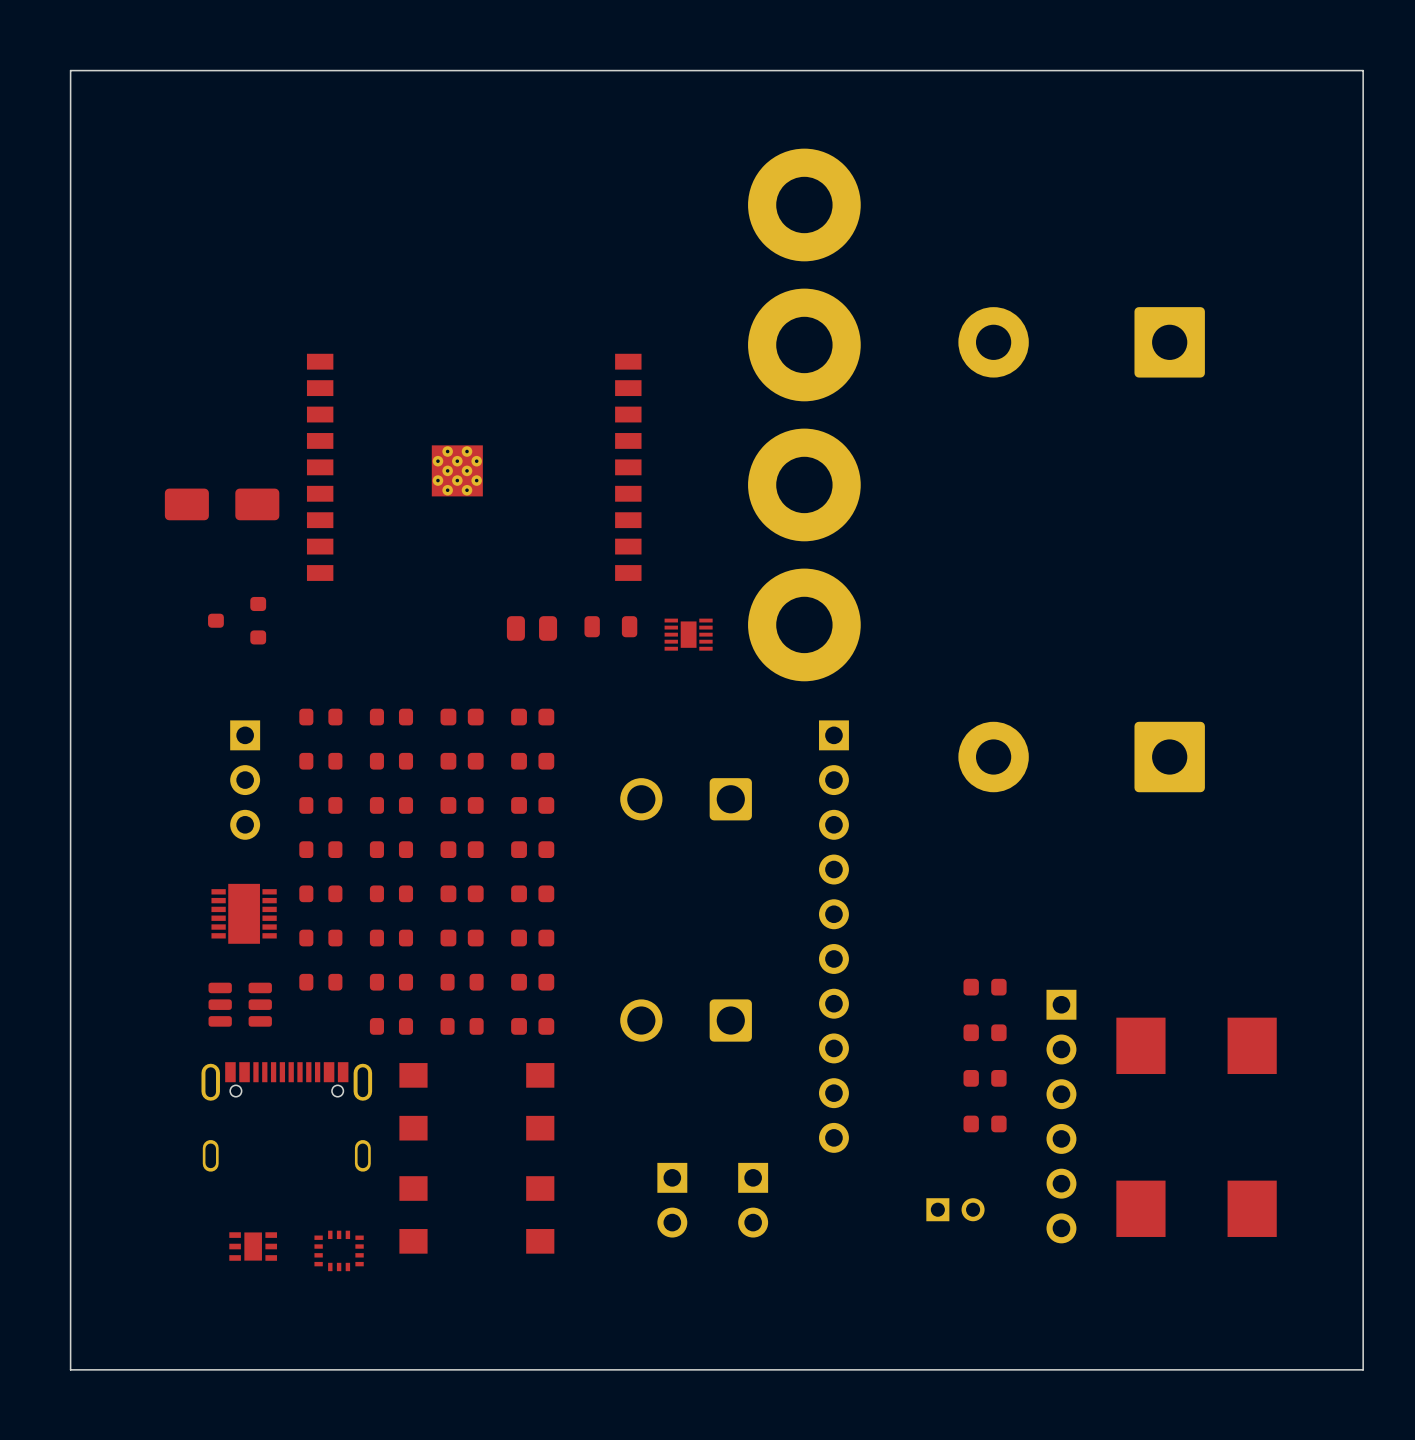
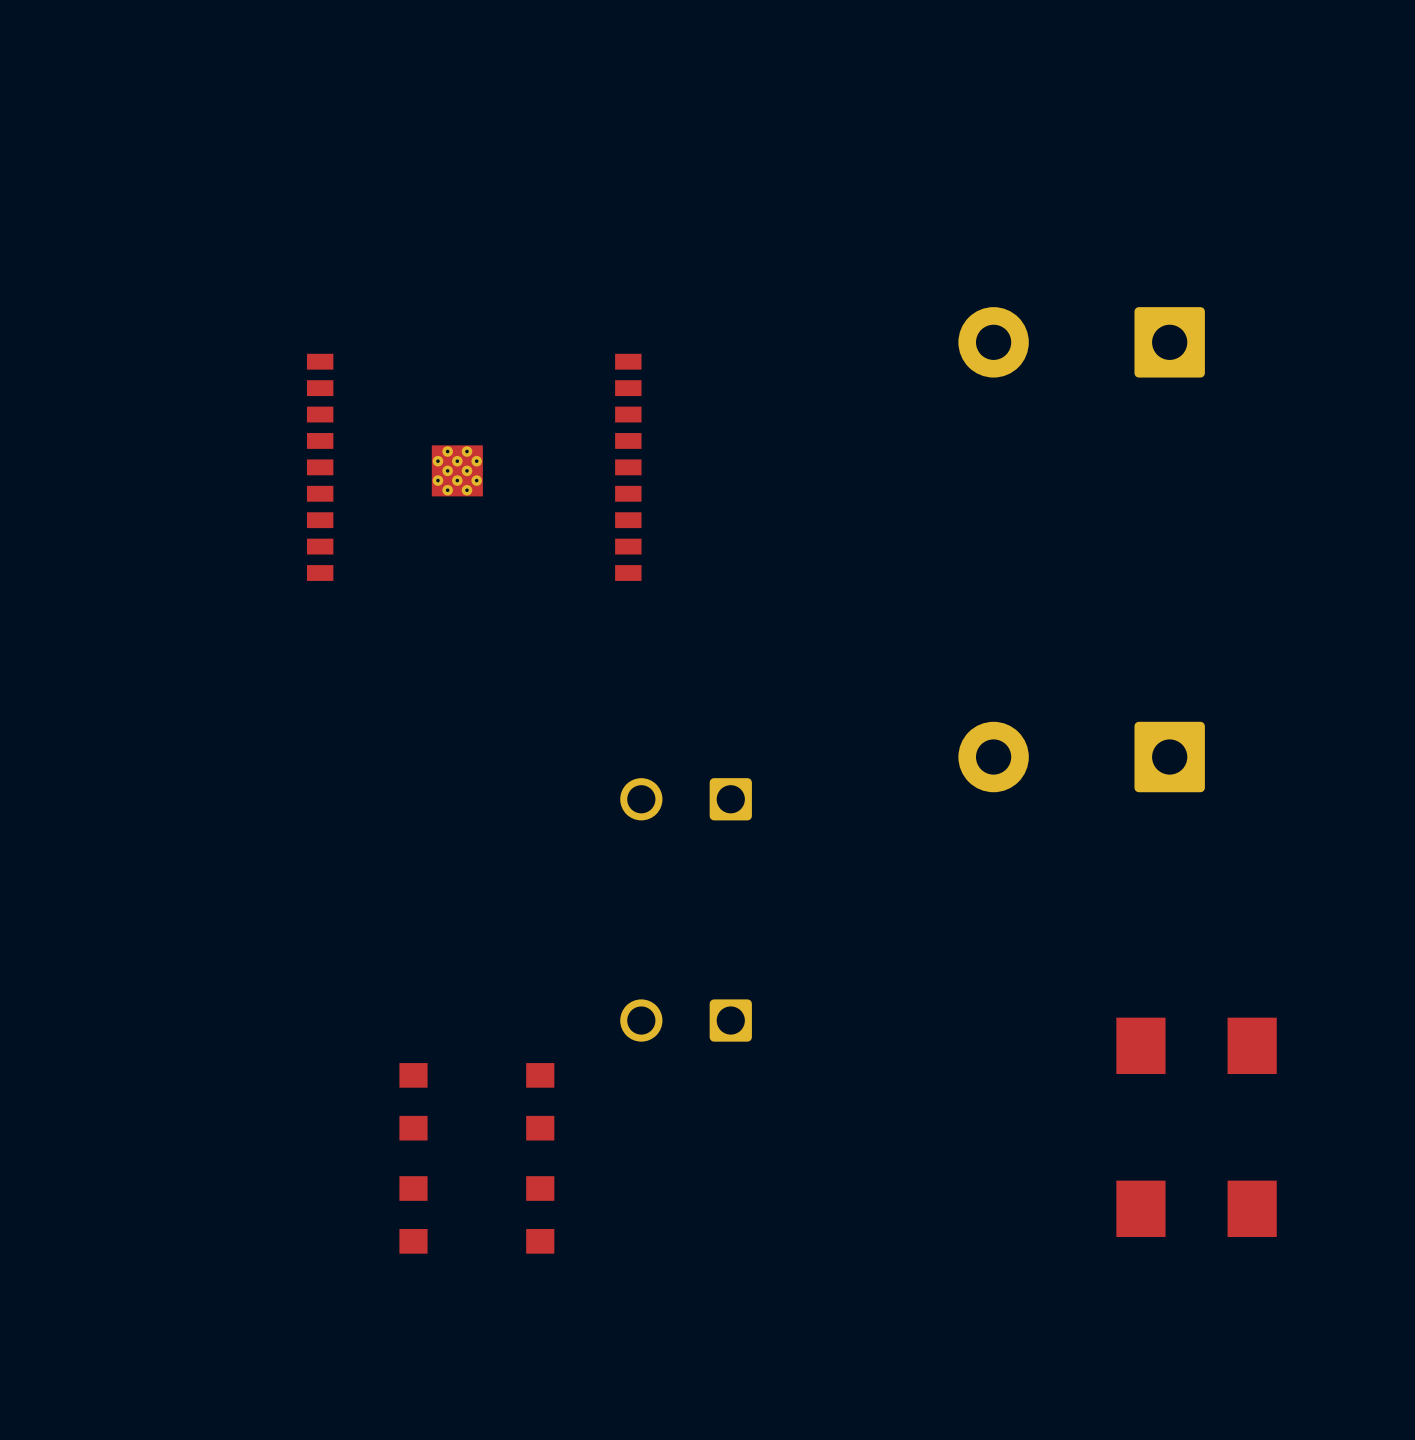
board edge: (1363, 70) (70, 70) (70, 1369) (1363, 1369) (1363, 70) -> none
part: (804, 204) -> none
part: (804, 344) -> none
part: (804, 484) -> none
part: (222, 504) -> none
part: (237, 620) -> none
part: (804, 624) -> none
part: (610, 626) -> none
part: (531, 628) -> none
part: (688, 634) -> none
part: (320, 717) -> none
part: (391, 717) -> none
part: (462, 717) -> none
part: (532, 717) -> none
part: (320, 761) -> none
part: (391, 761) -> none
part: (462, 761) -> none
part: (532, 761) -> none
part: (245, 780) -> none
part: (320, 805) -> none
part: (391, 805) -> none
part: (462, 805) -> none
part: (532, 805) -> none
part: (320, 849) -> none
part: (391, 849) -> none
part: (462, 849) -> none
part: (532, 849) -> none
part: (320, 893) -> none
part: (391, 893) -> none
part: (462, 893) -> none
part: (532, 893) -> none
part: (244, 913) -> none
part: (833, 936) -> none
part: (320, 938) -> none
part: (391, 938) -> none
part: (462, 938) -> none
part: (532, 938) -> none
part: (320, 982) -> none
part: (391, 982) -> none
part: (462, 982) -> none
part: (532, 982) -> none
part: (985, 987) -> none
part: (240, 1004) -> none
part: (391, 1026) -> none
part: (462, 1026) -> none
part: (532, 1026) -> none
part: (985, 1032) -> none
part: (985, 1078) -> none
part: (286, 1116) -> none
part: (1061, 1116) -> none
part: (985, 1123) -> none
part: (672, 1200) -> none
part: (753, 1200) -> none
part: (955, 1209) -> none
part: (253, 1246) -> none
part: (339, 1250) -> none

